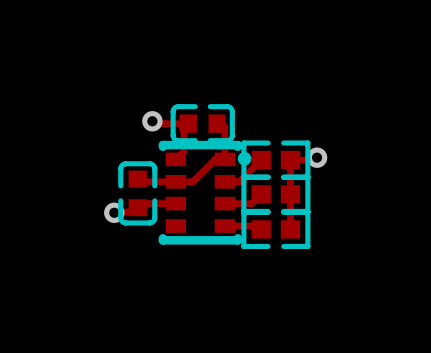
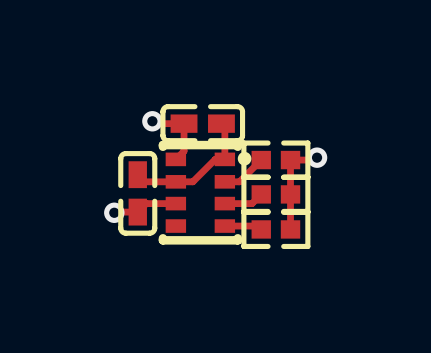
part footprint: [170, 104, 235, 144] -> [160, 104, 246, 144]
part footprint: [118, 161, 158, 226] -> [118, 151, 158, 236]

